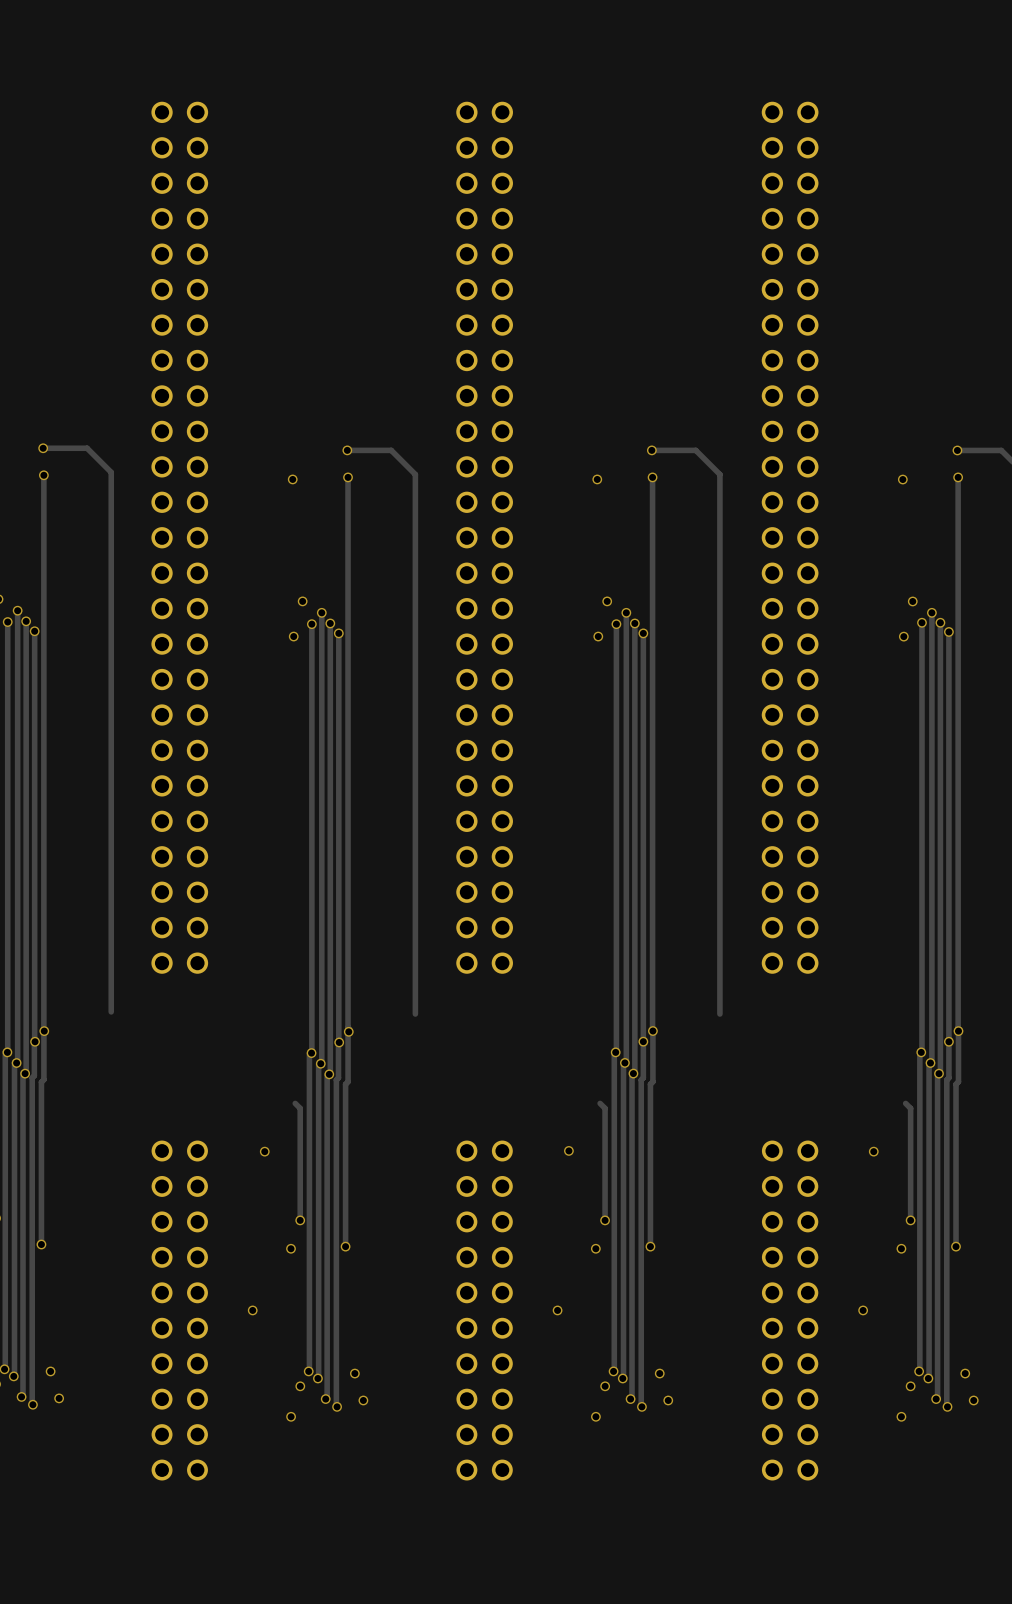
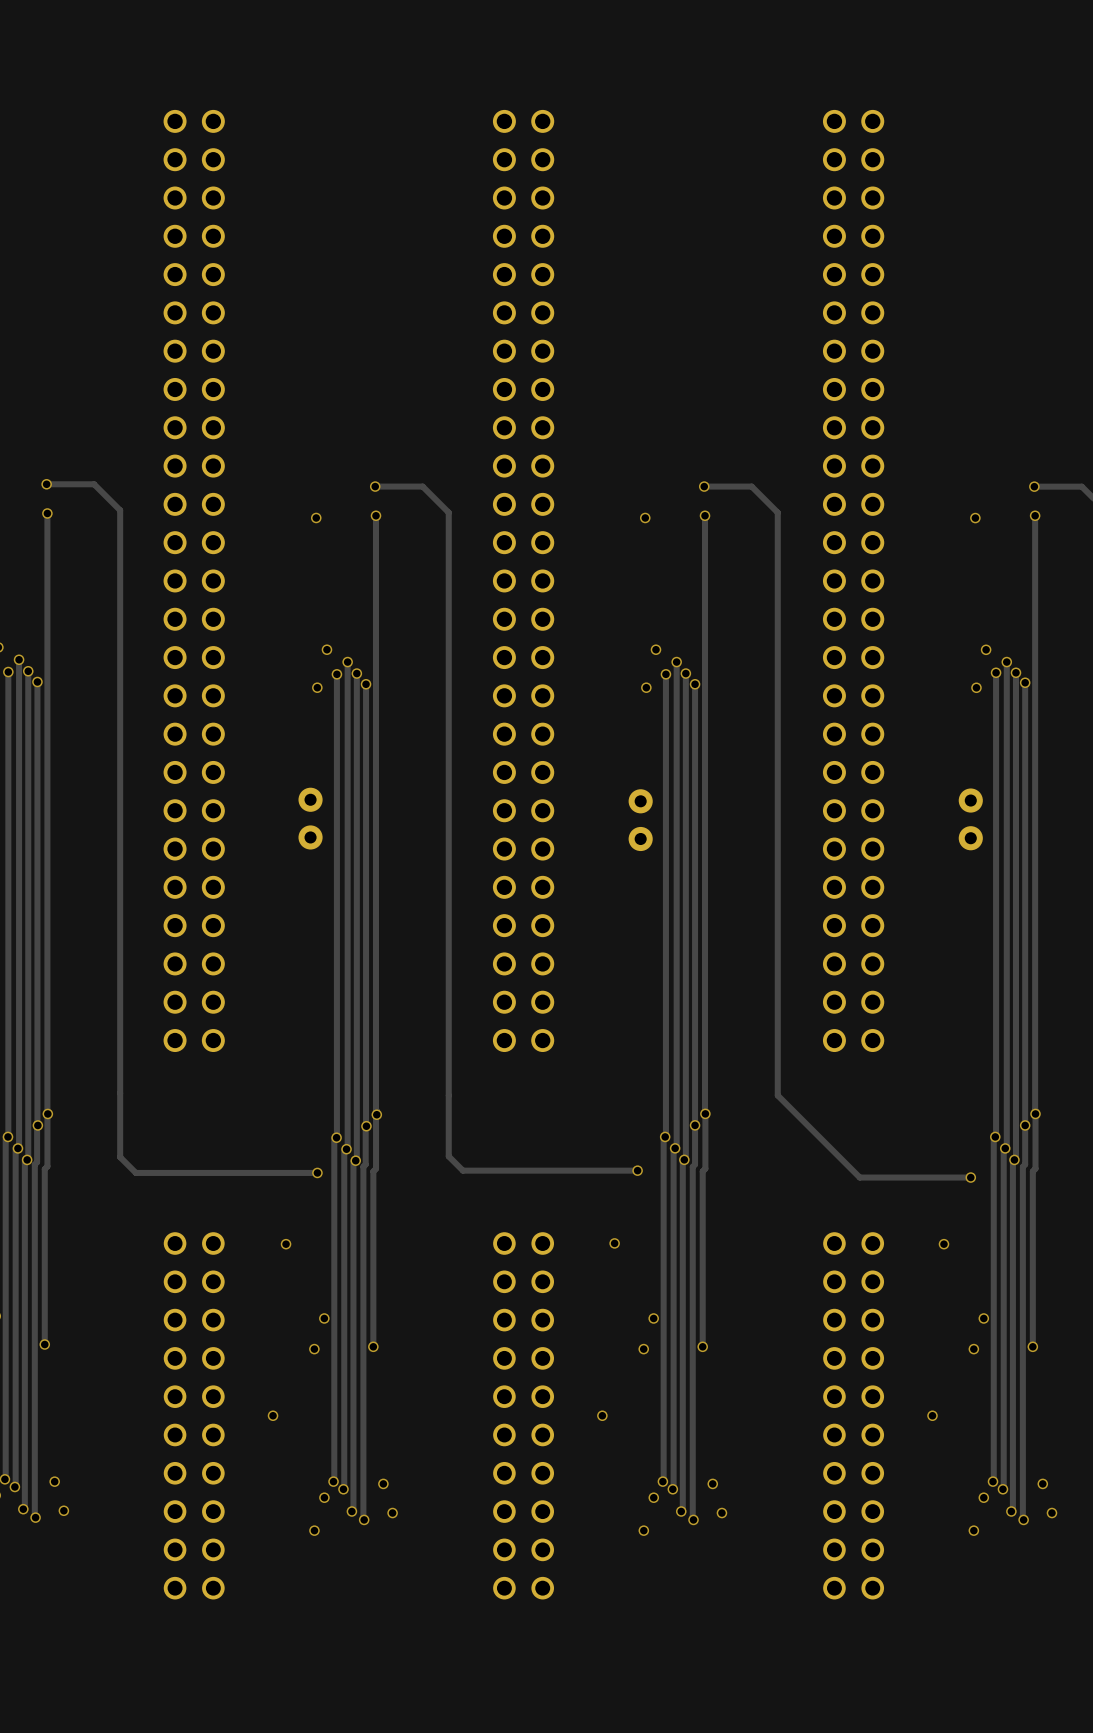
part: none -> (310, 818)
part: none -> (970, 819)
part: none -> (640, 820)
track: none -> (120, 1093) (120, 1157) (135, 1172) (317, 1172)
track: none -> (448, 1095) (448, 1156) (462, 1170) (637, 1170)
track: none -> (777, 1095) (859, 1177) (970, 1177)
via: none -> (637, 1170)
via: none -> (317, 1172)
via: none -> (970, 1177)
track: (295, 1103) (300, 1108) (300, 1220) -> none
track: (600, 1103) (605, 1108) (605, 1220) -> none
track: (905, 1103) (910, 1108) (910, 1220) -> none

